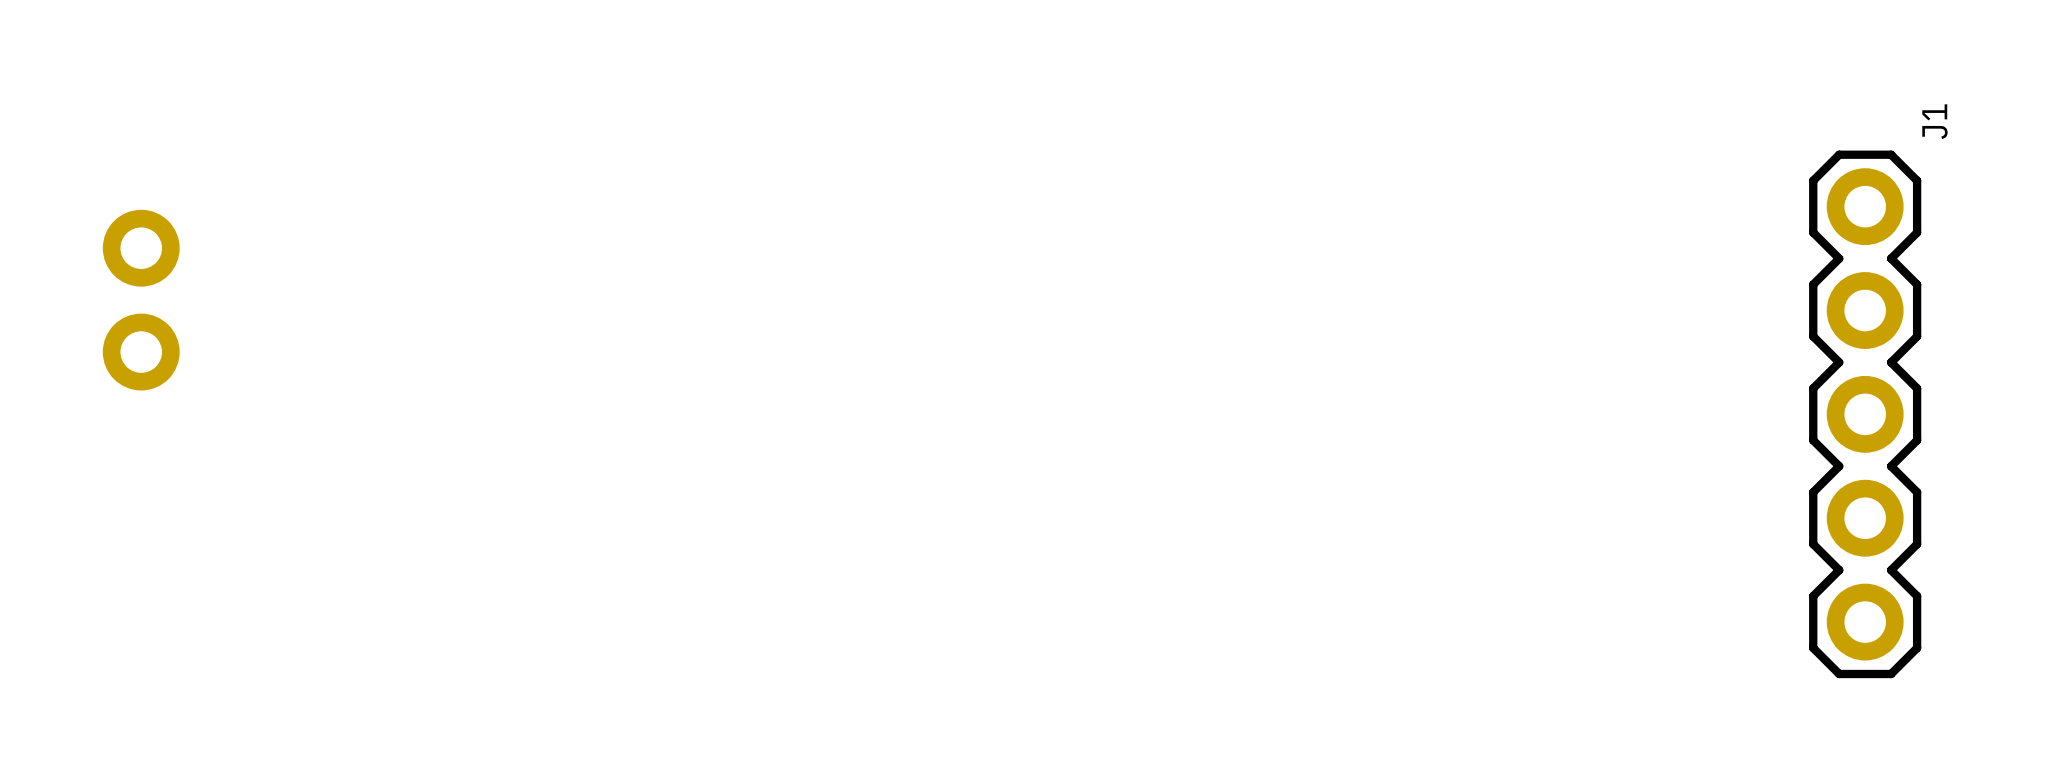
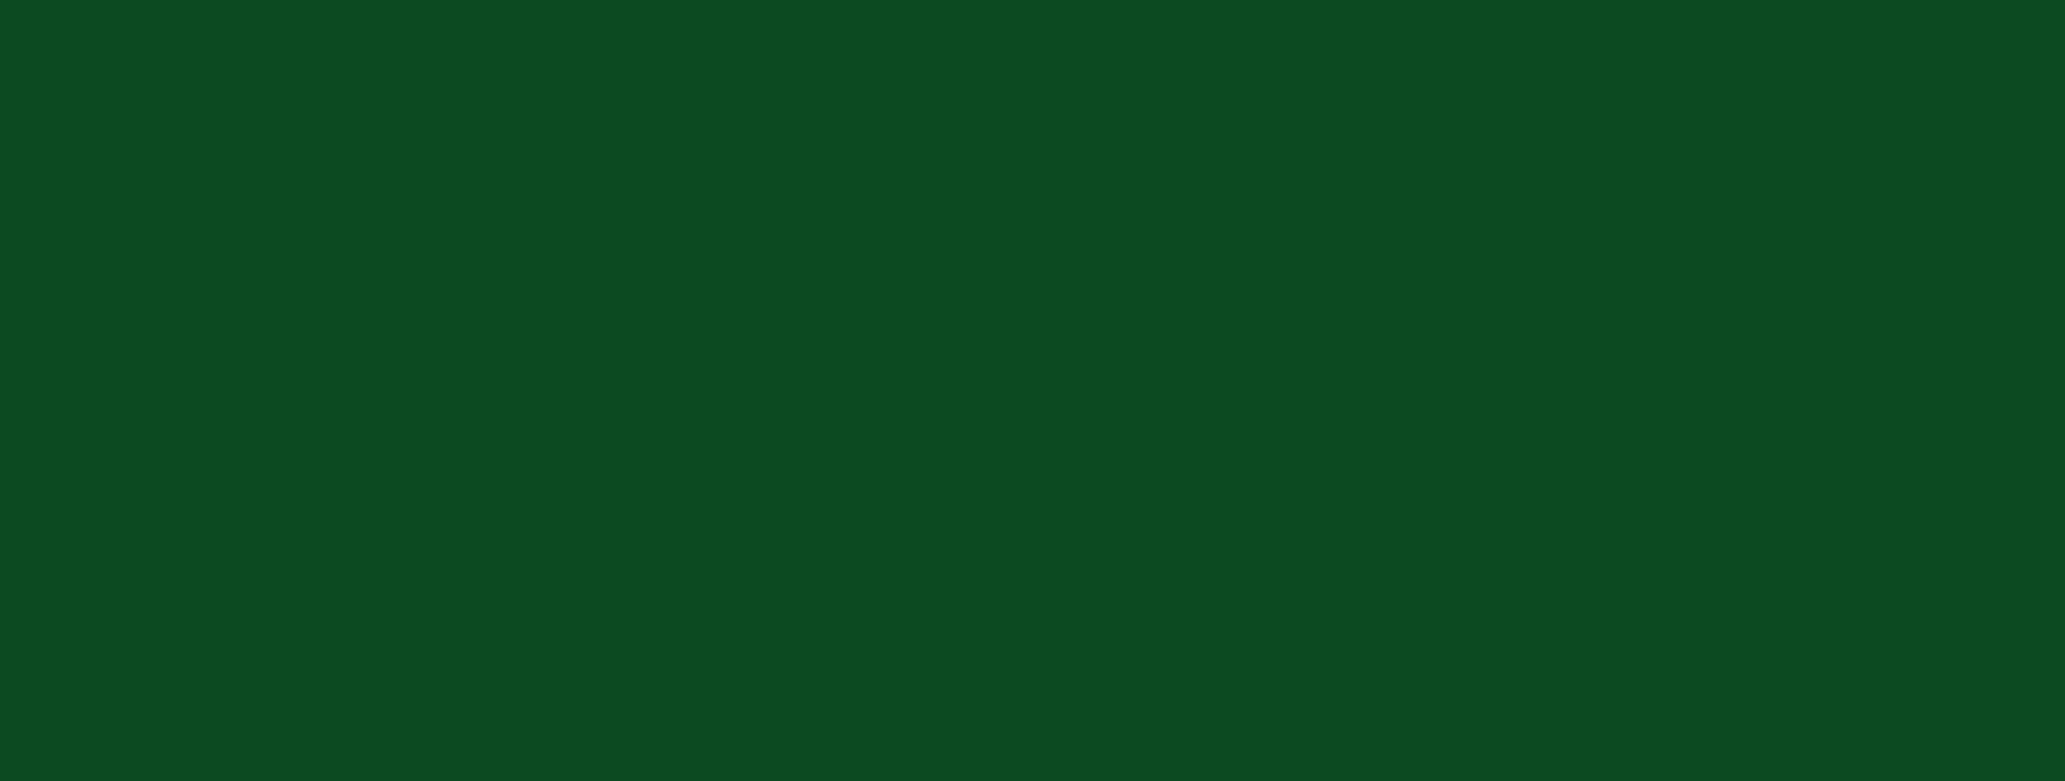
part: (141, 300) -> none
J1: (1865, 414) -> none

